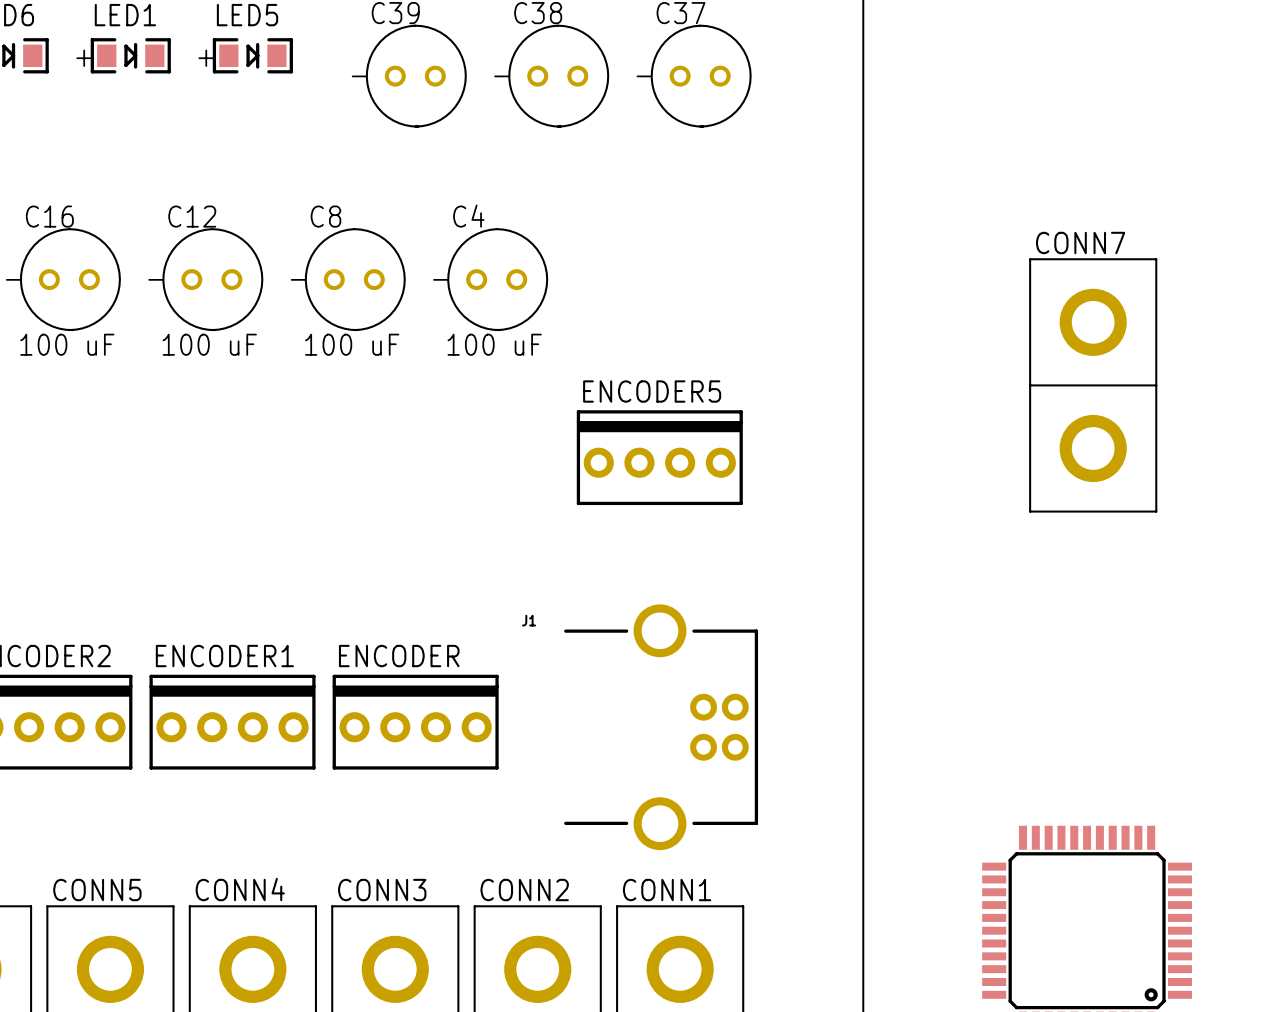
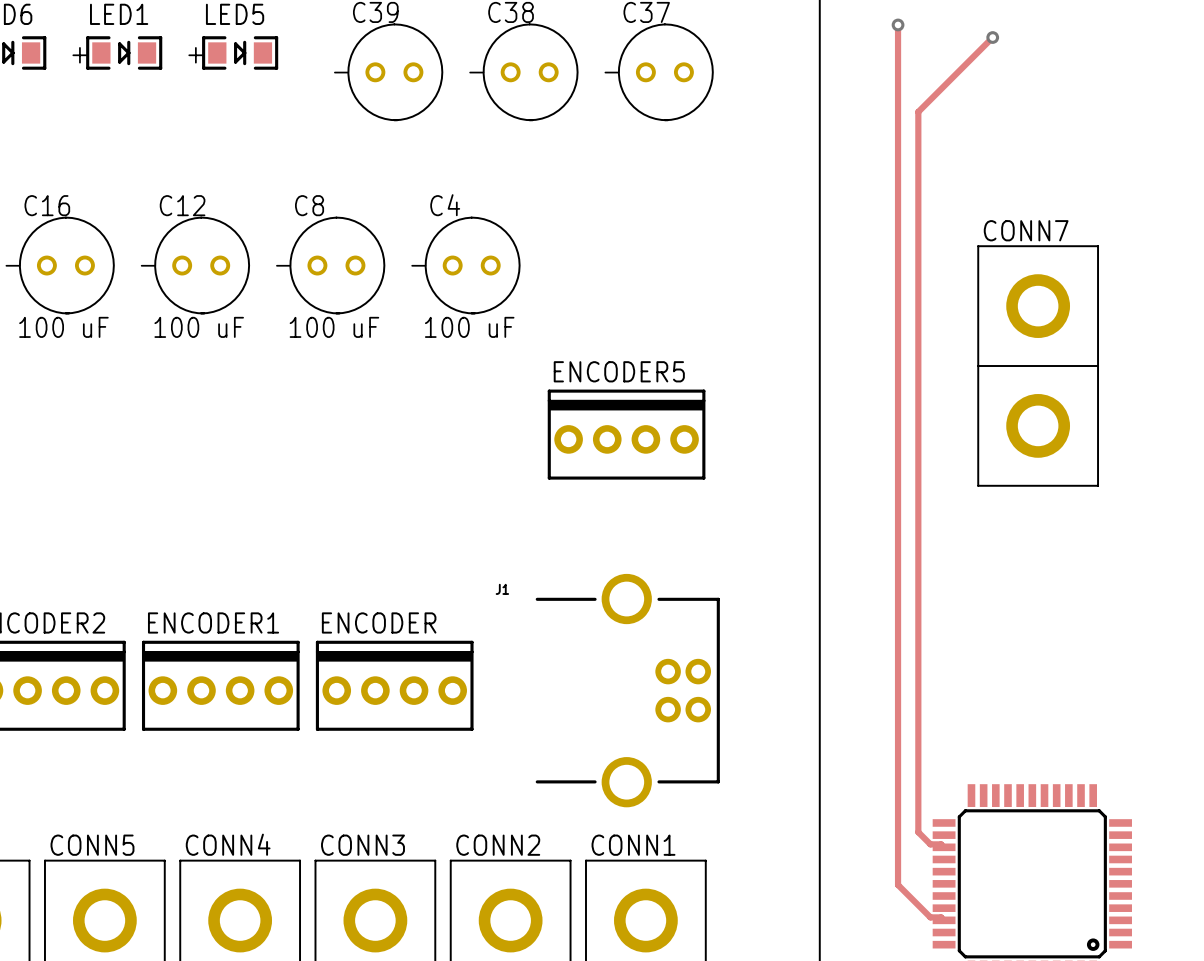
track: none -> (898, 24) (898, 884) (930, 917) (941, 917) (944, 920)
via: none -> (898, 24)
track: none -> (992, 37) (918, 111) (918, 832) (930, 844) (941, 844) (944, 847)
via: none -> (992, 37)

